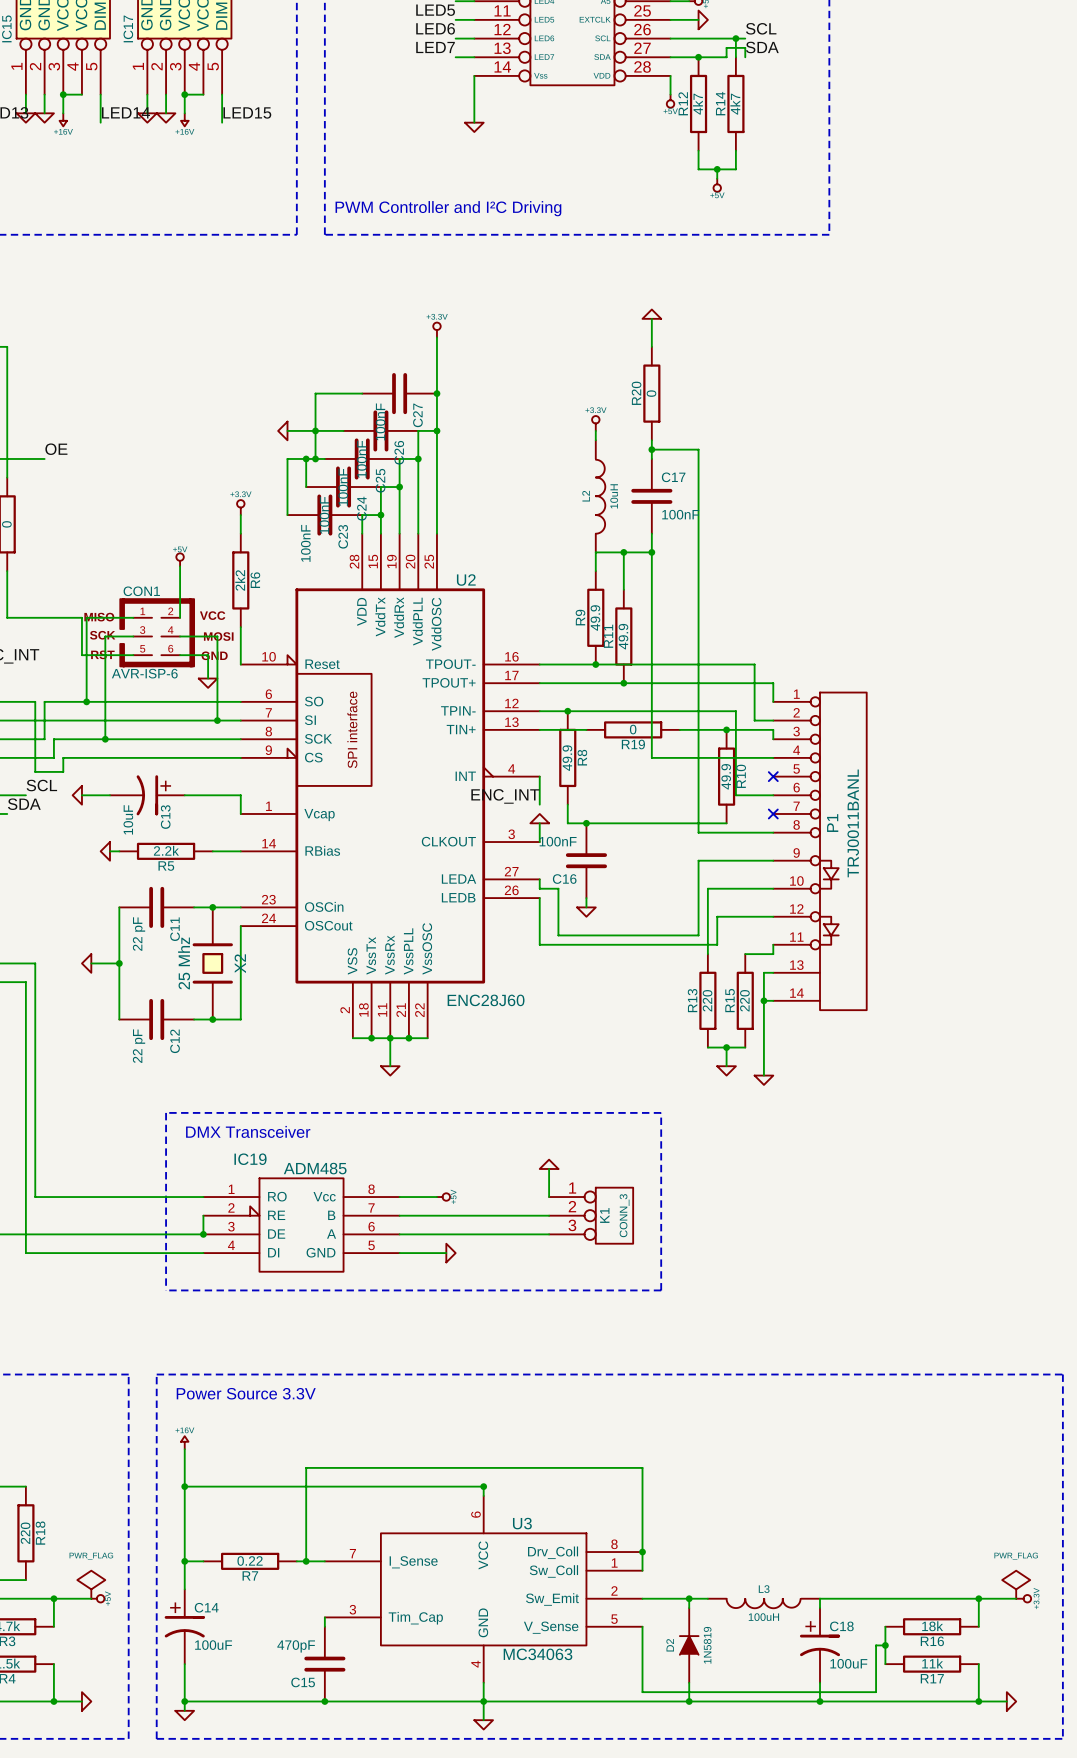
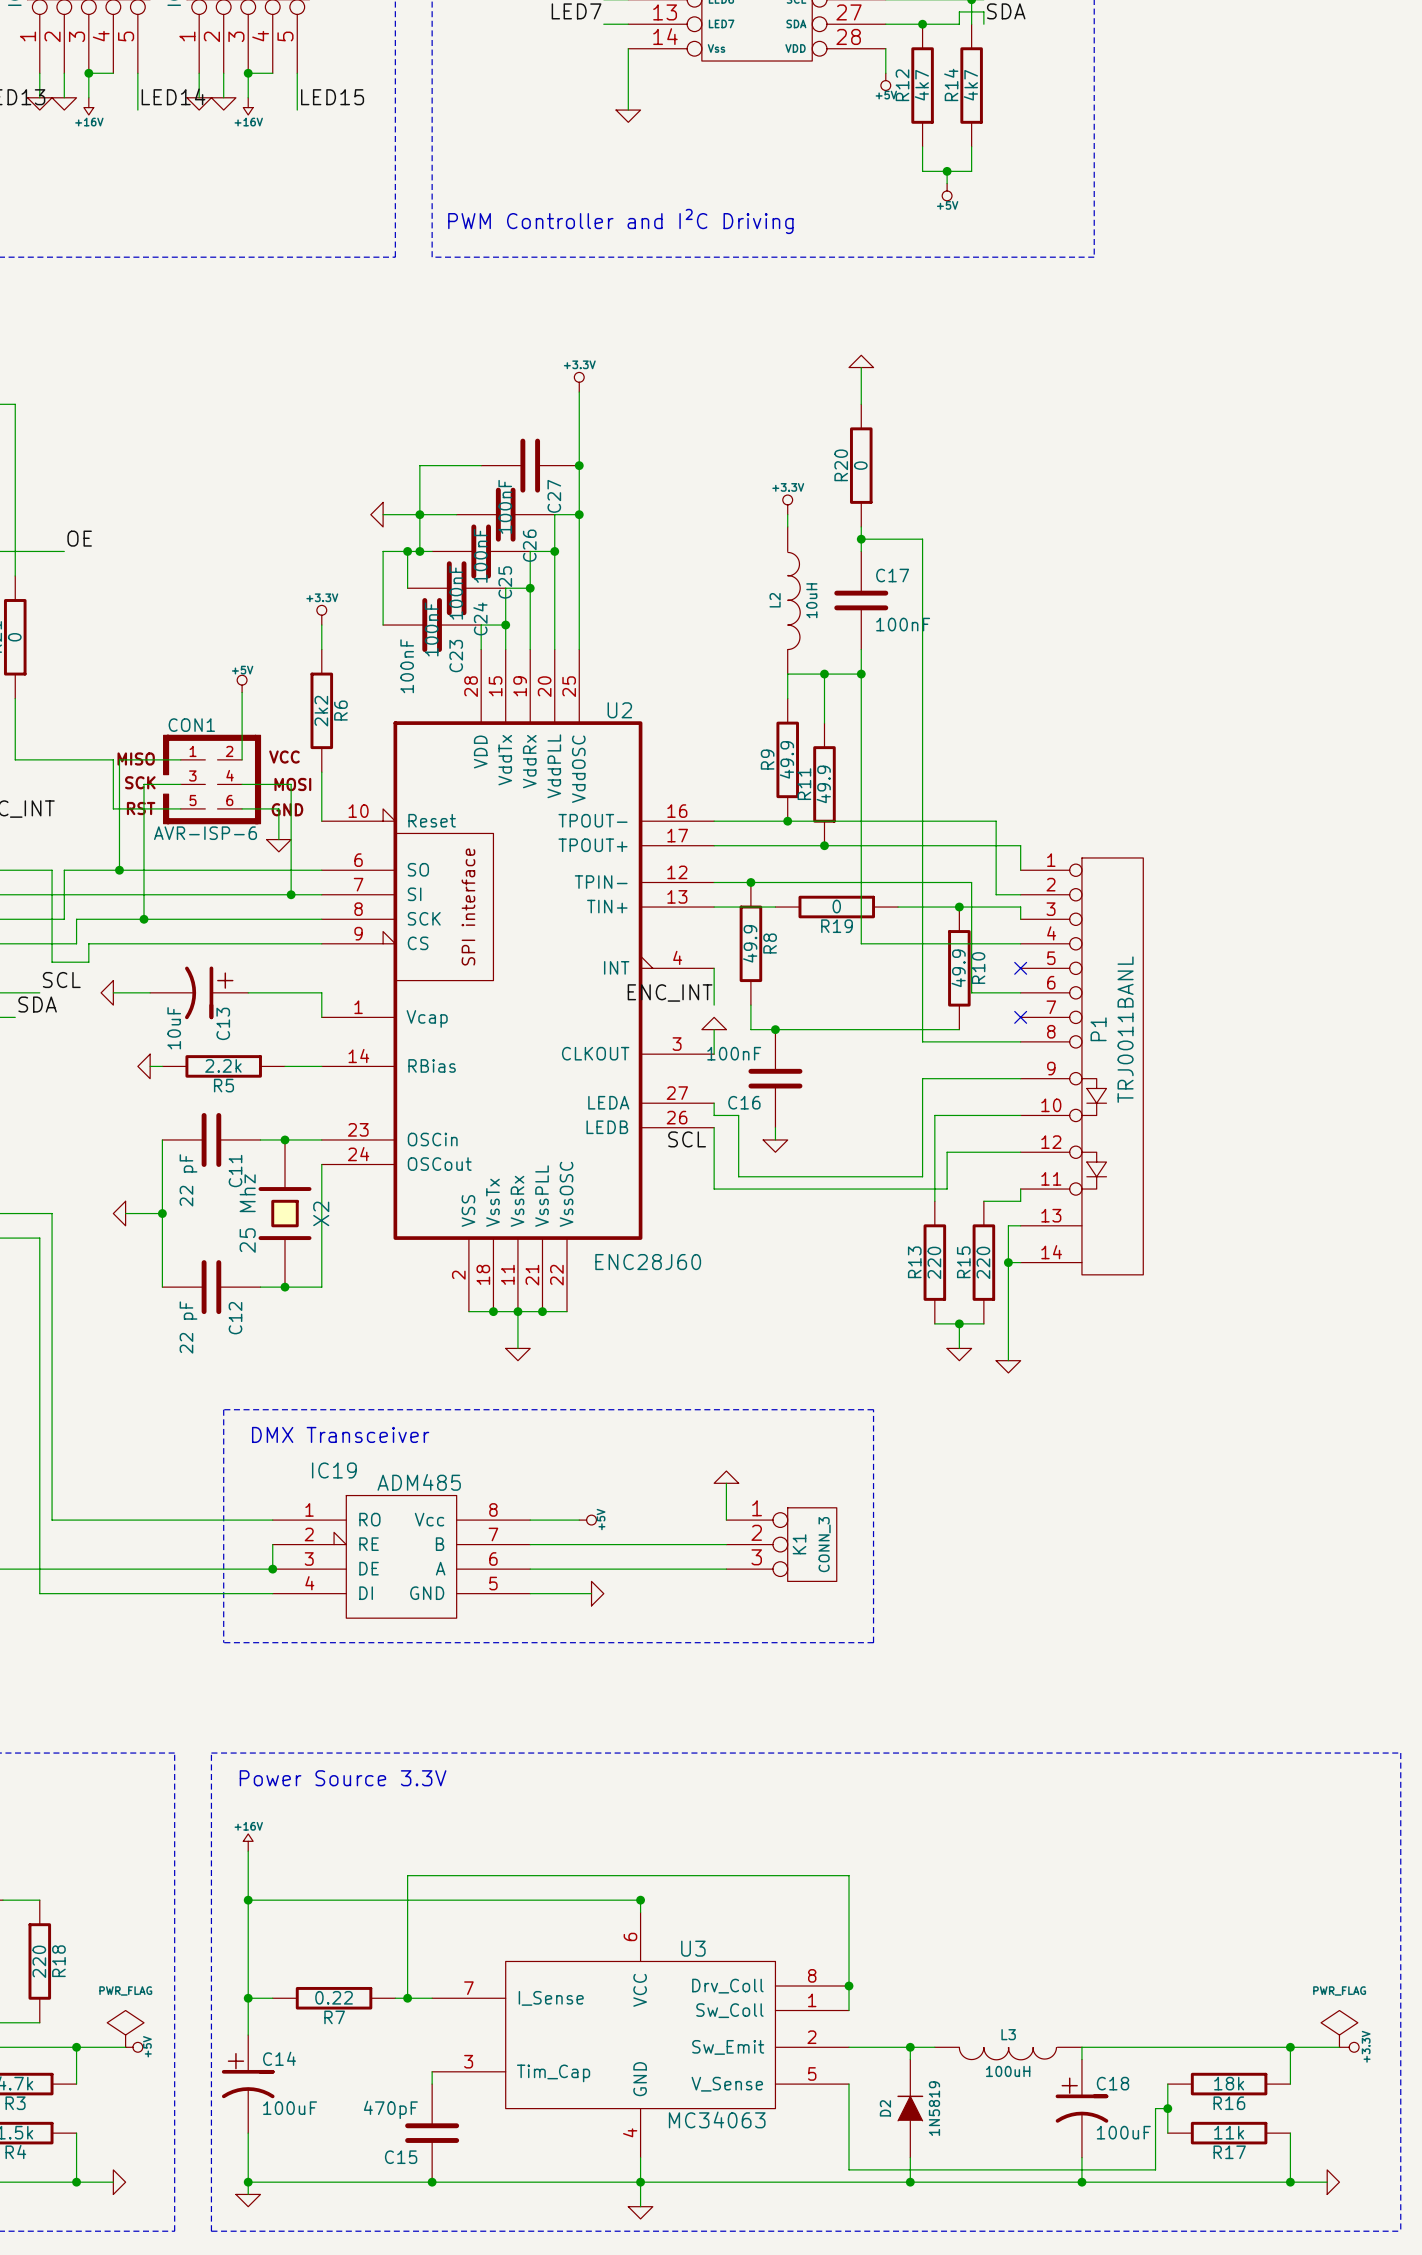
label: none -> SCL (687, 1139)

